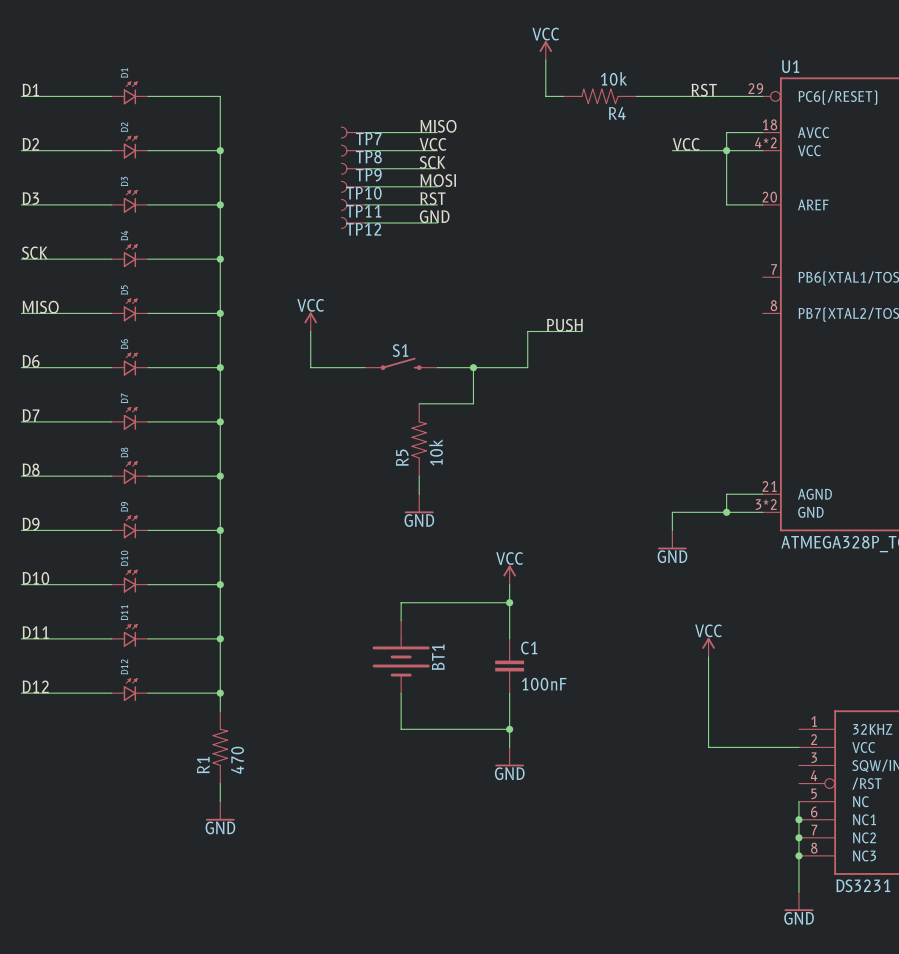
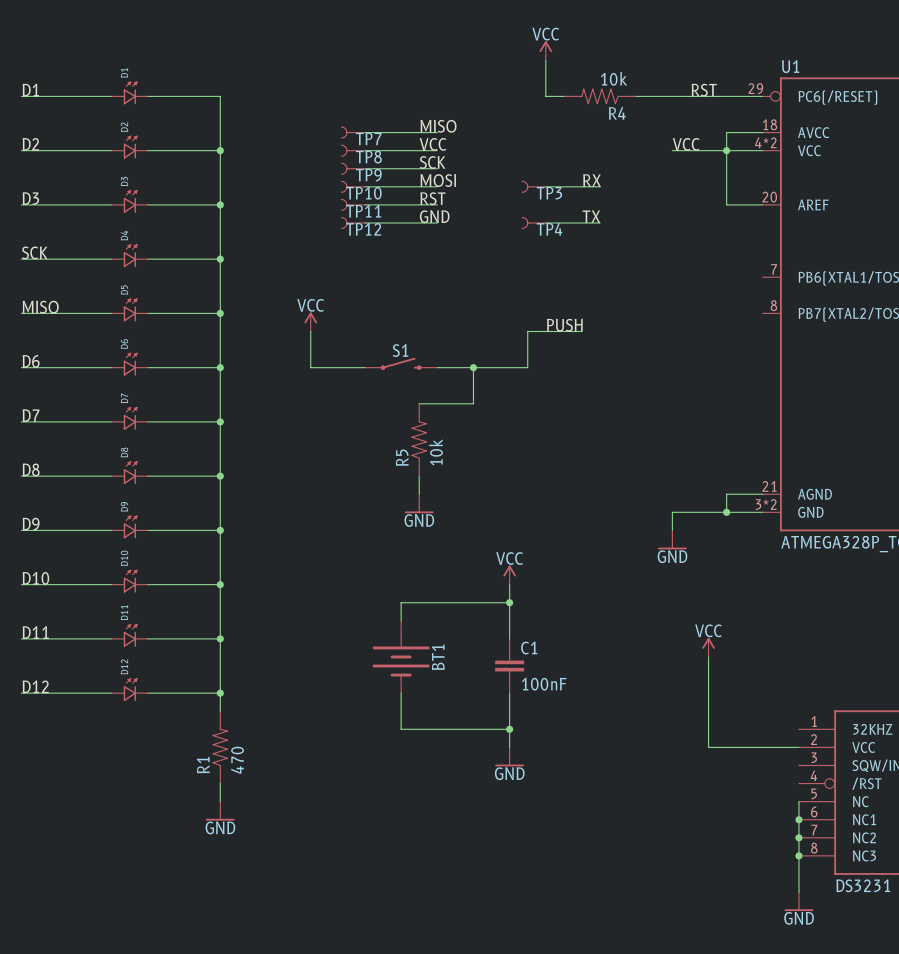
label: none -> RX (592, 180)
TP3: none -> (534, 186)
wire: none -> (545, 186) (600, 186)
label: none -> TX (591, 216)
TP4: none -> (534, 222)
wire: none -> (545, 222) (600, 222)

